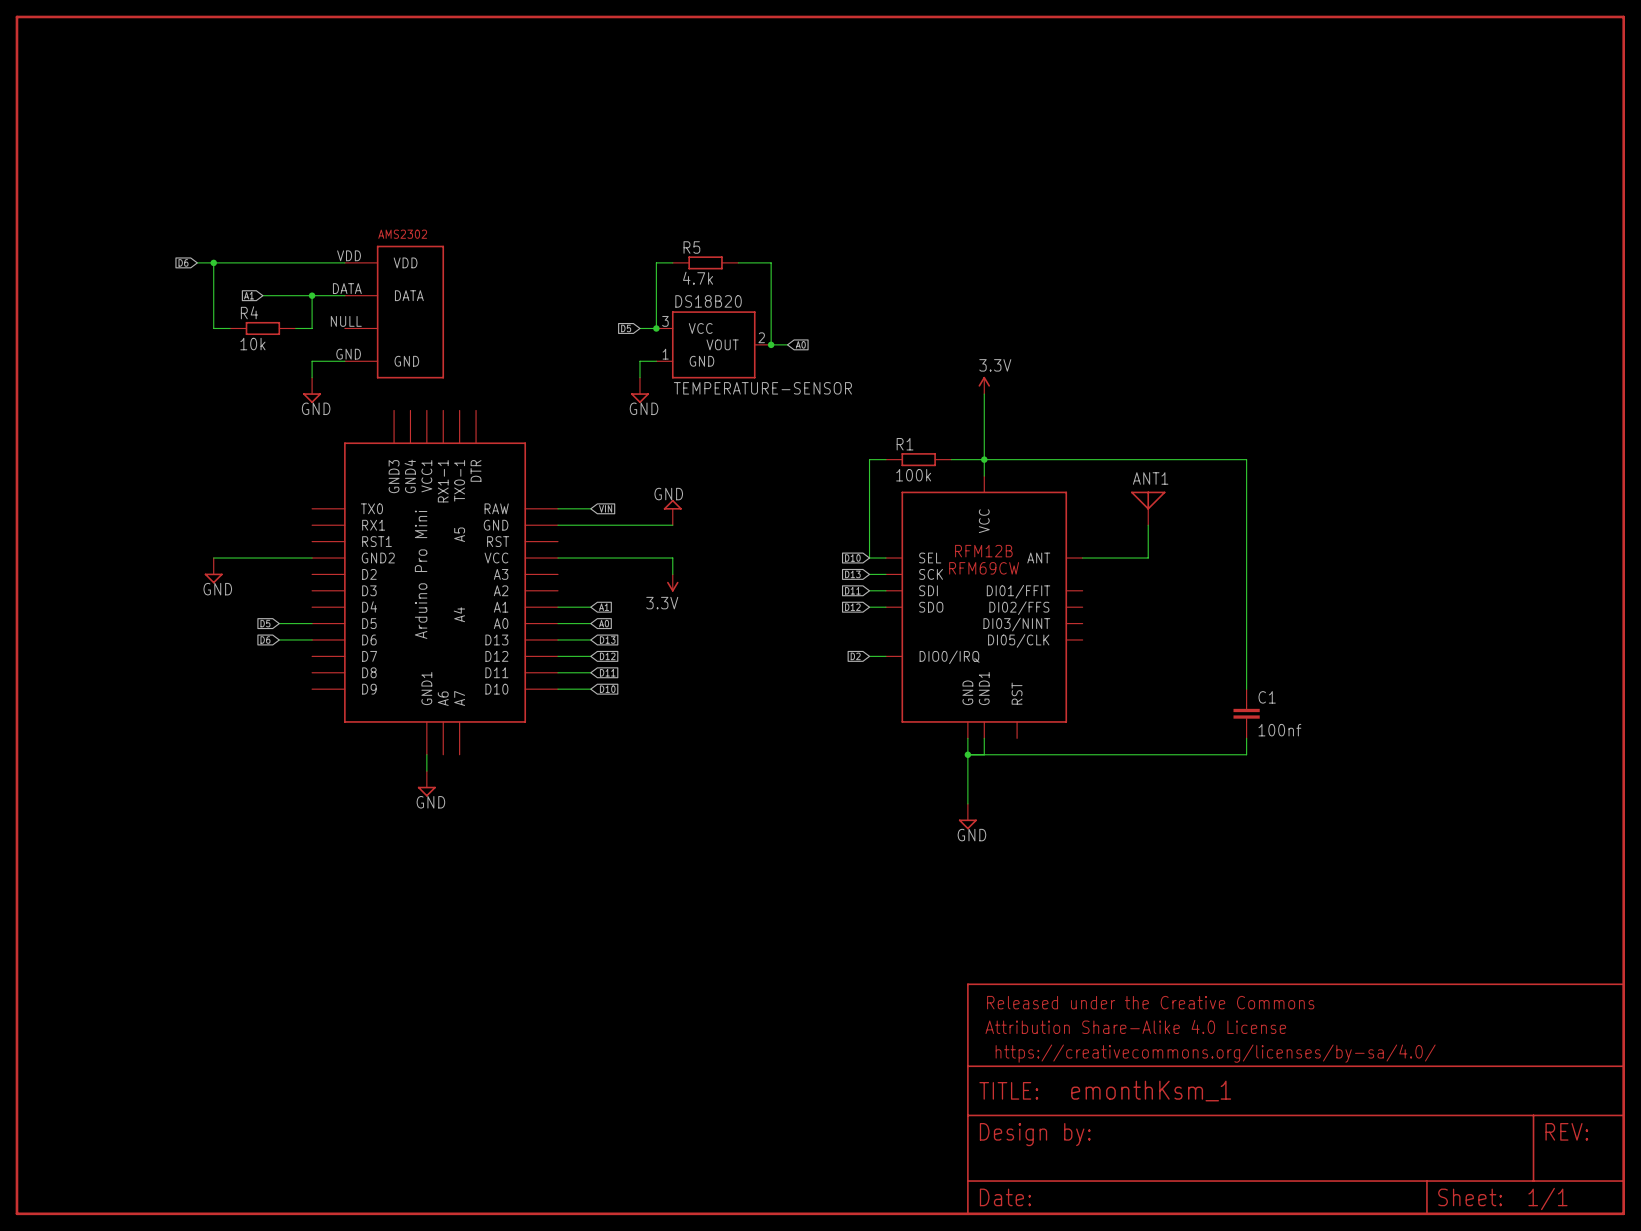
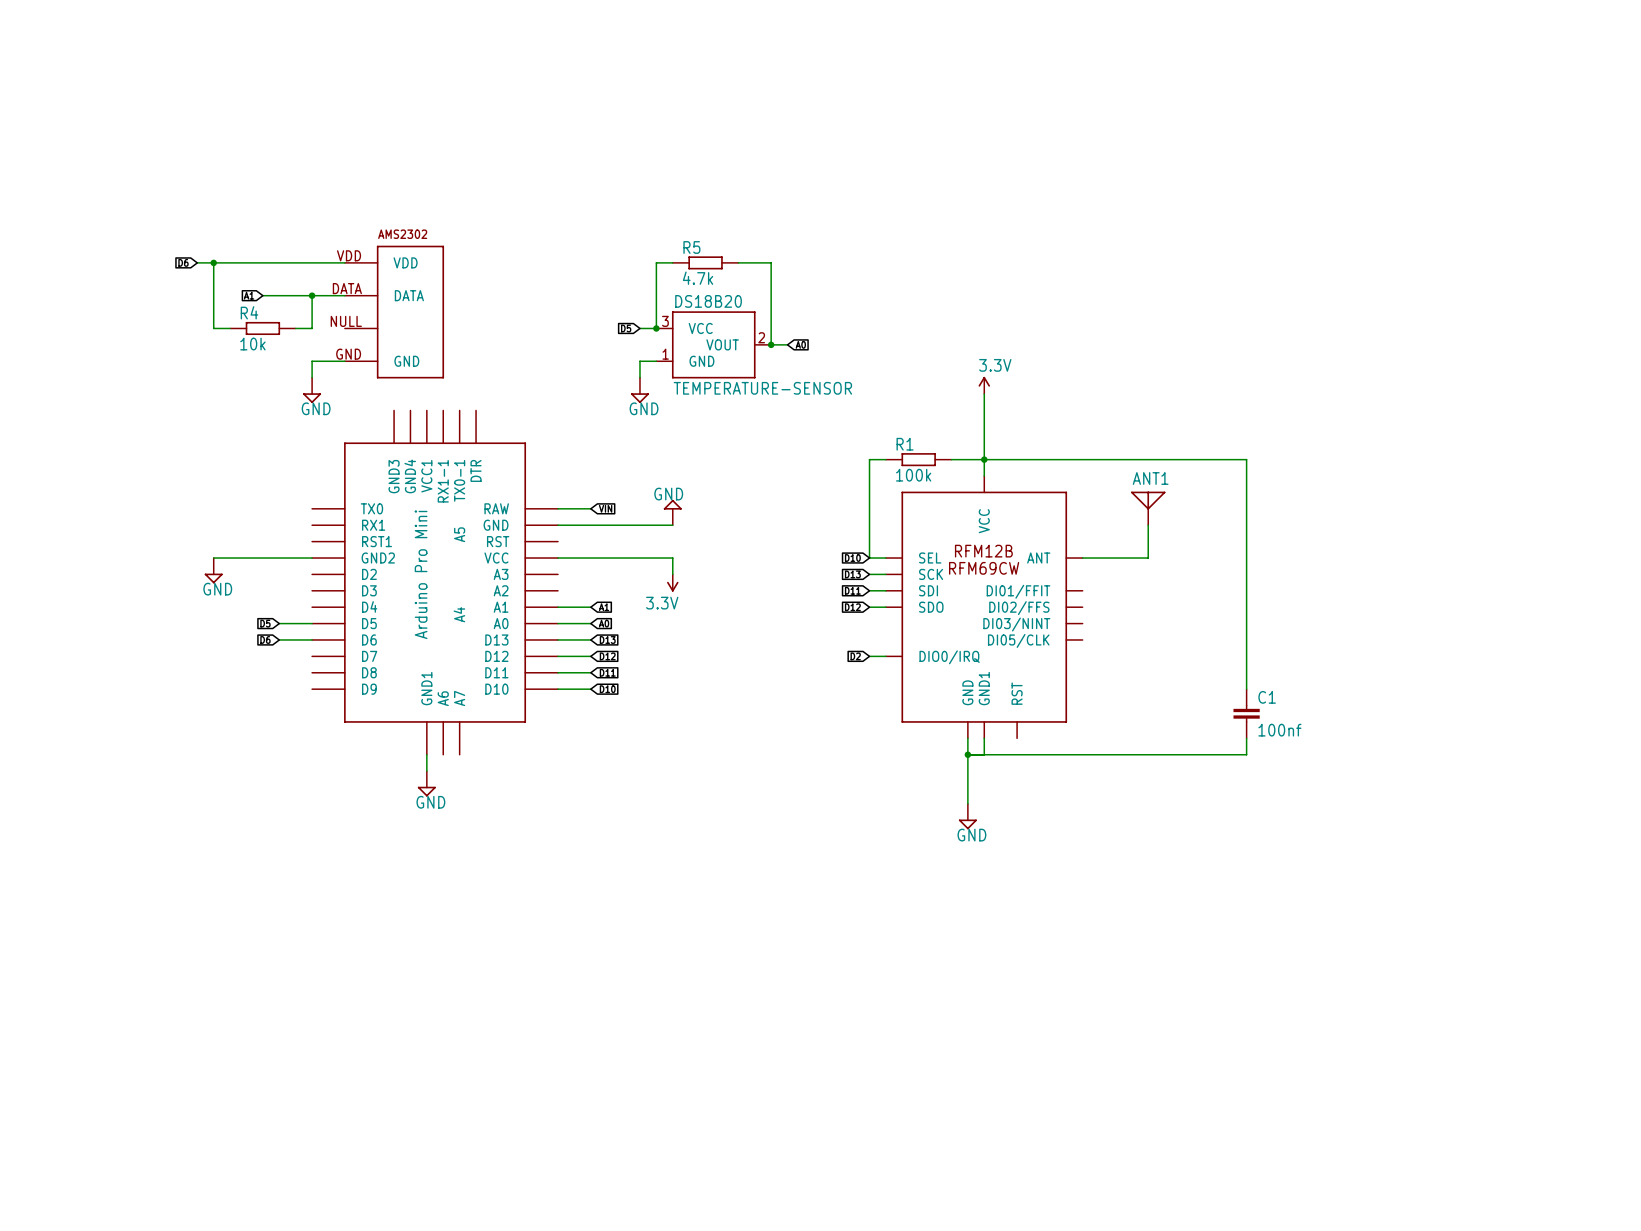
part: (820, 615) -> none
part: (1295, 1099) -> none

